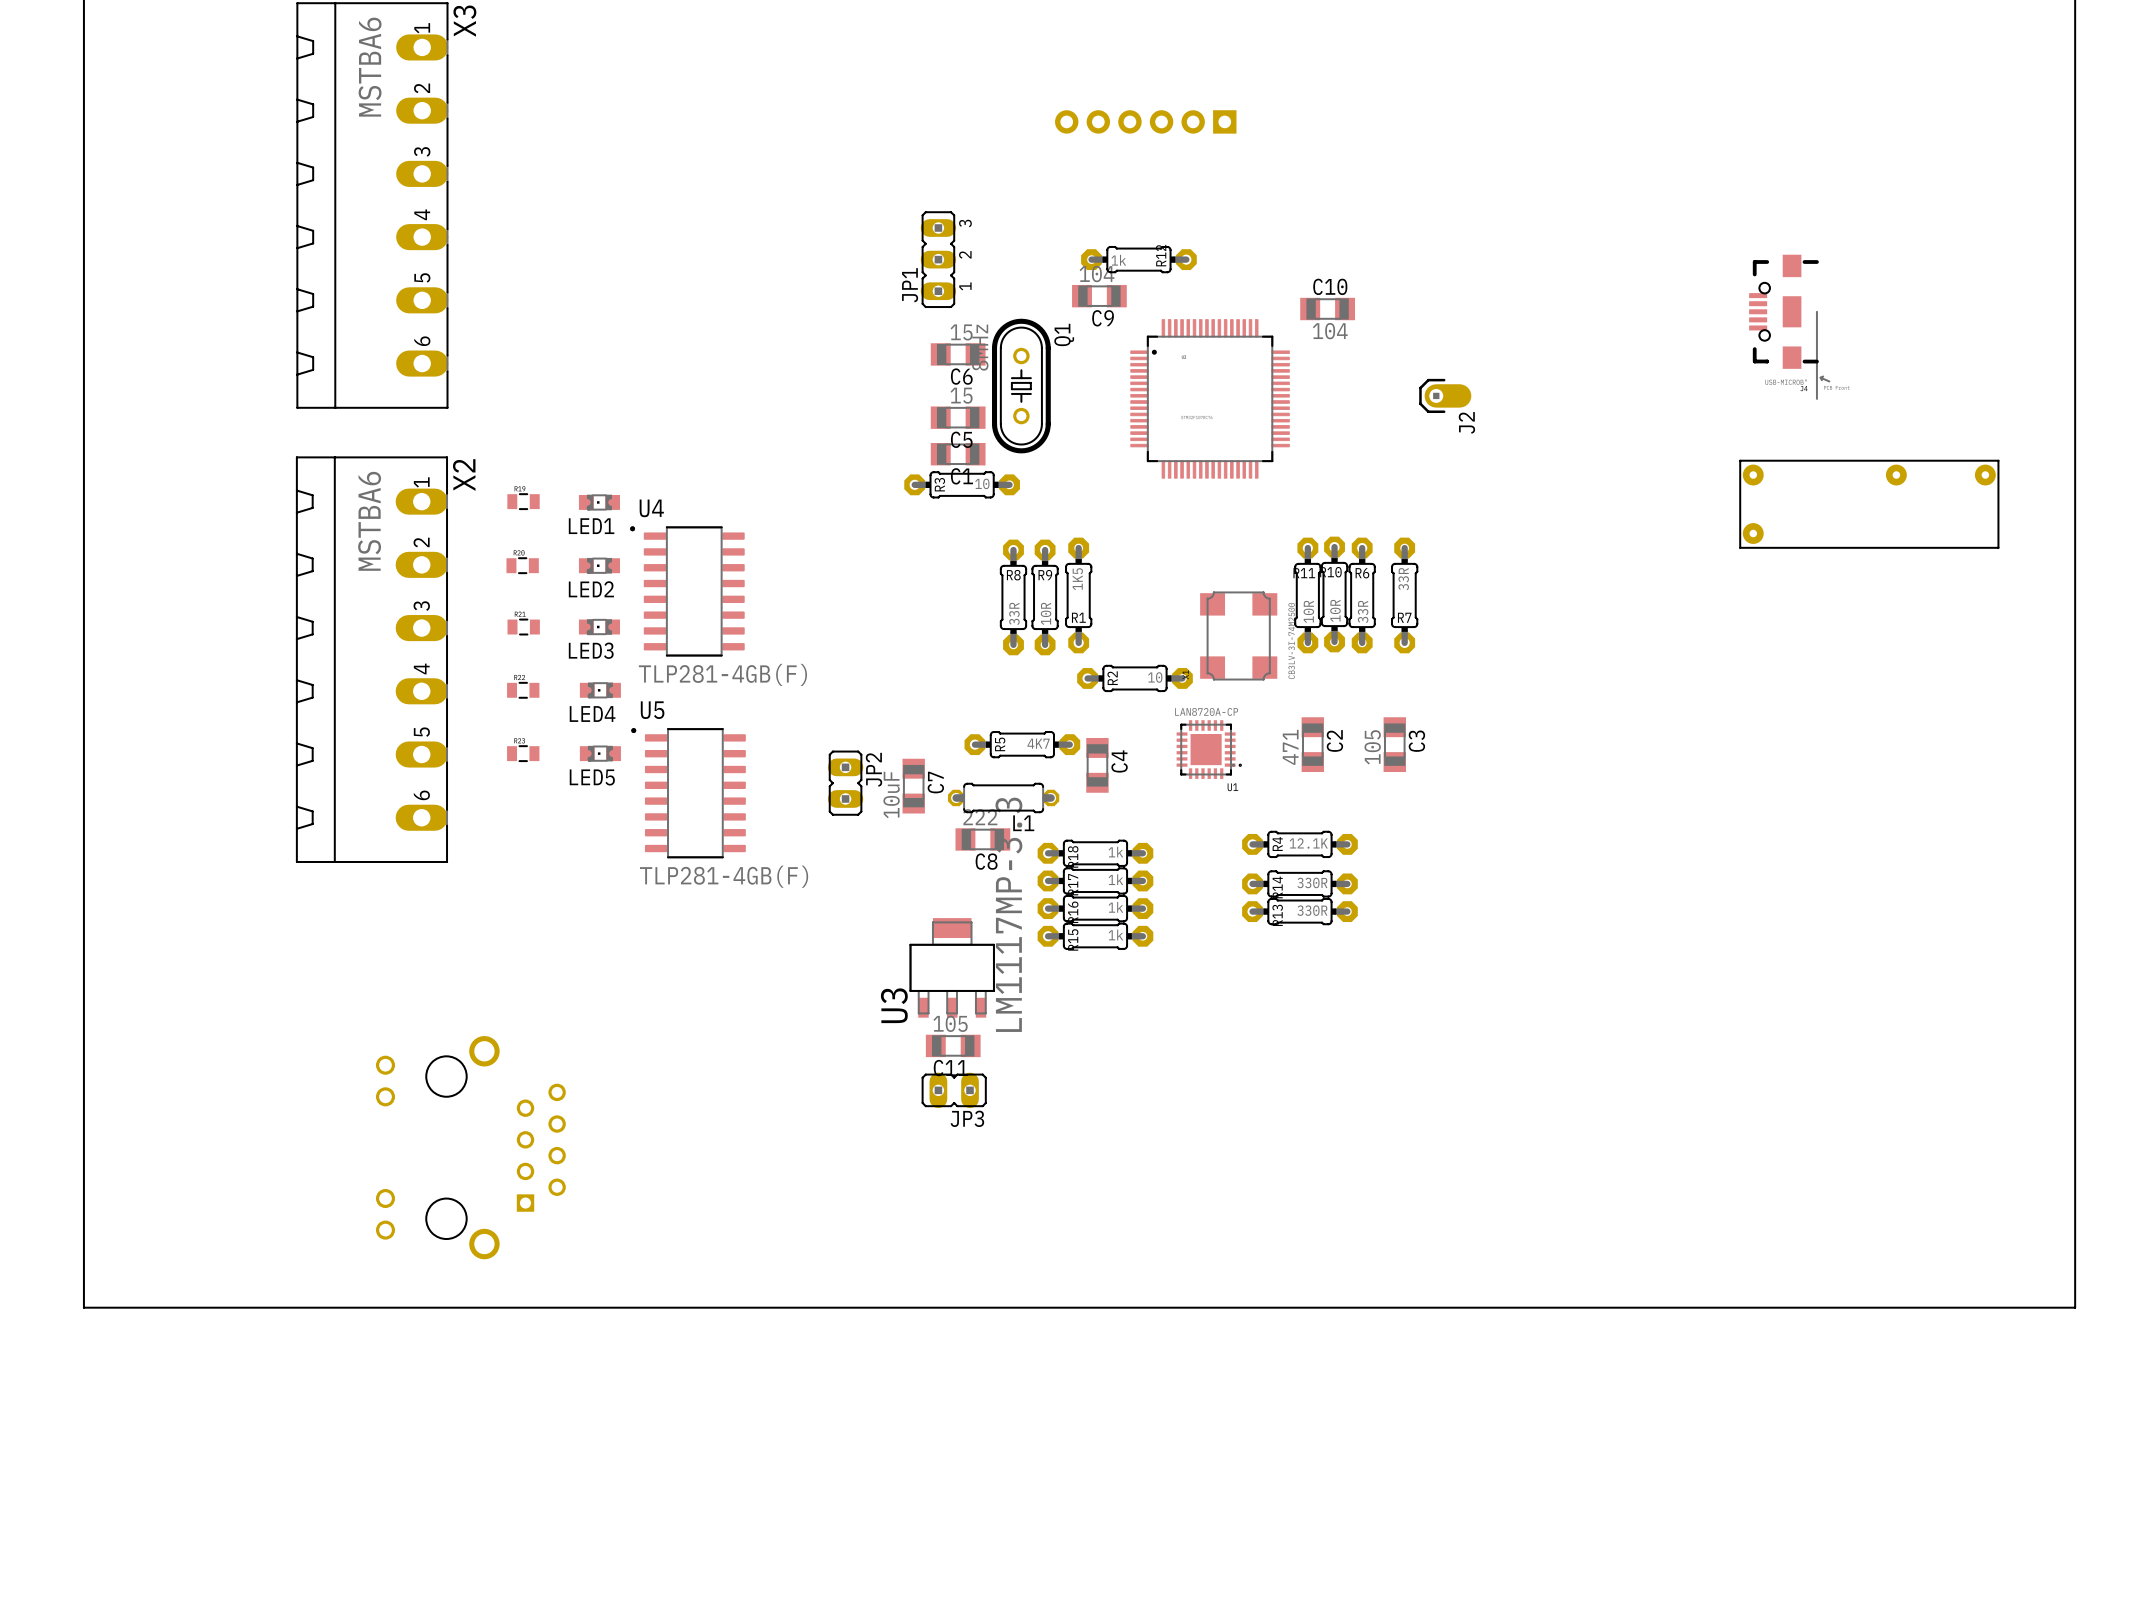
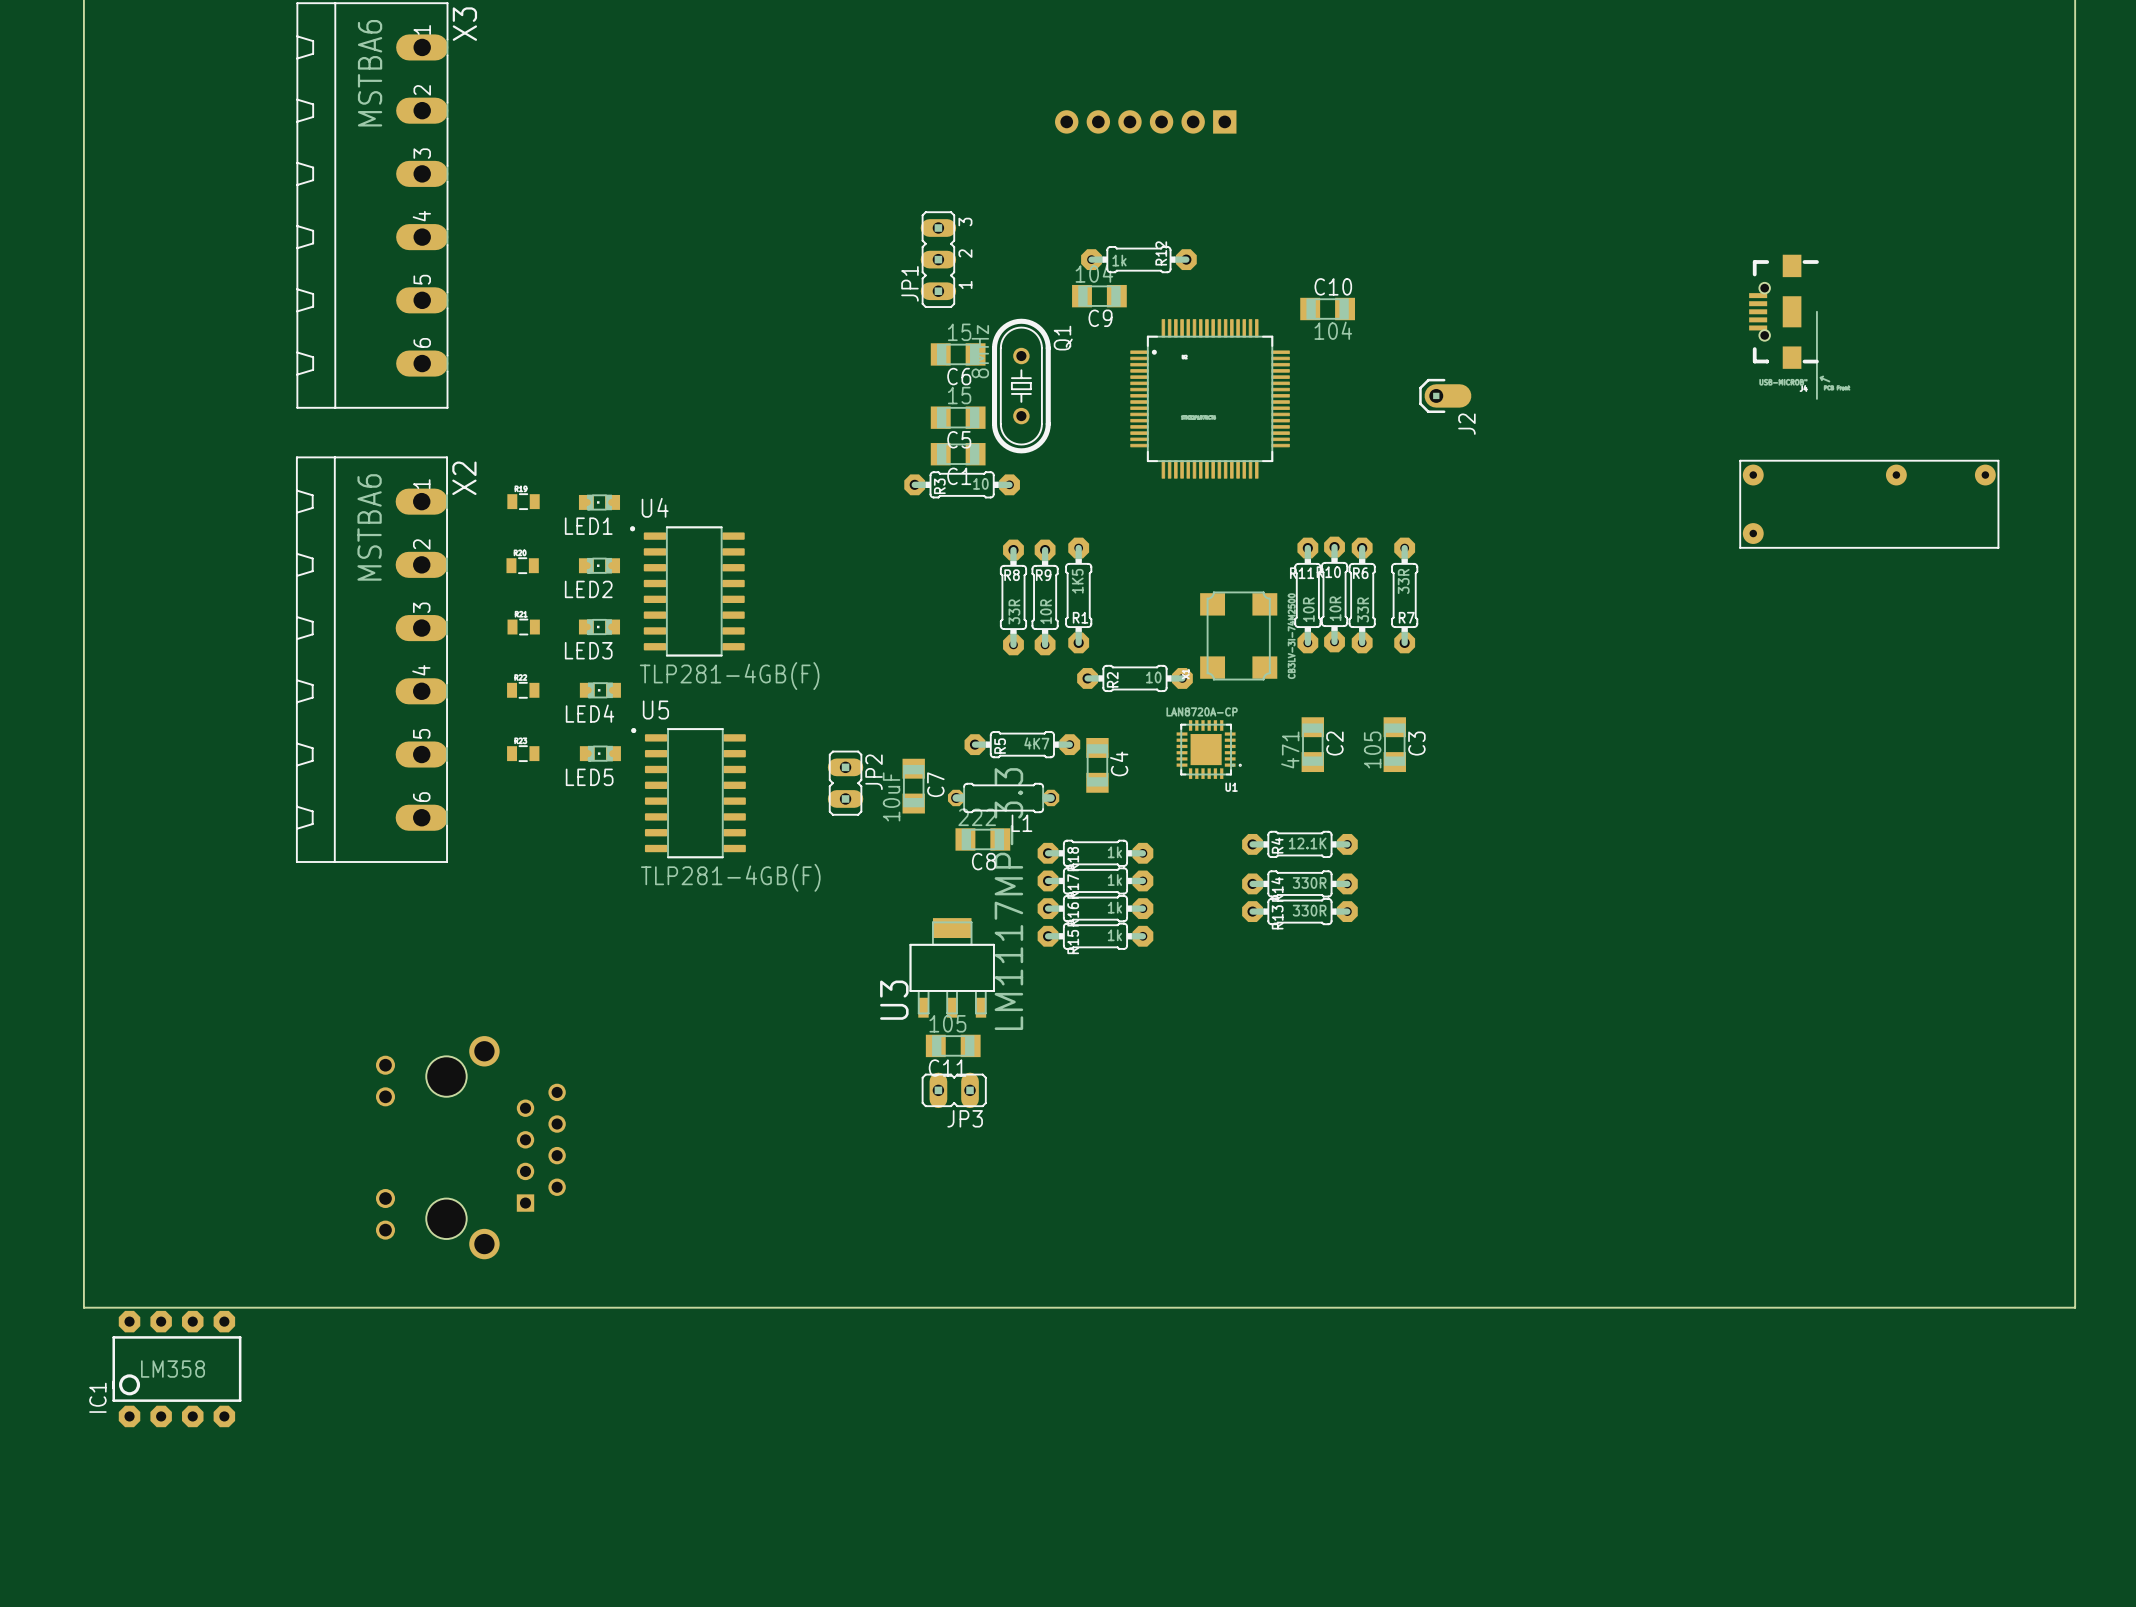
IC1: none -> LM358 (176, 1369)

